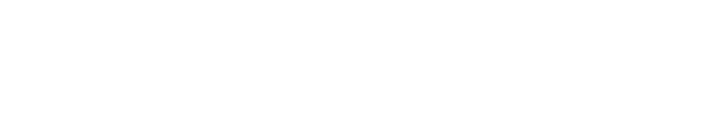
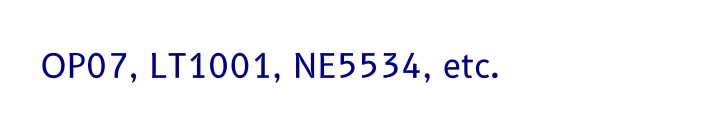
text: none -> OP07, LT1001, NE5534, etc. (269, 67)

